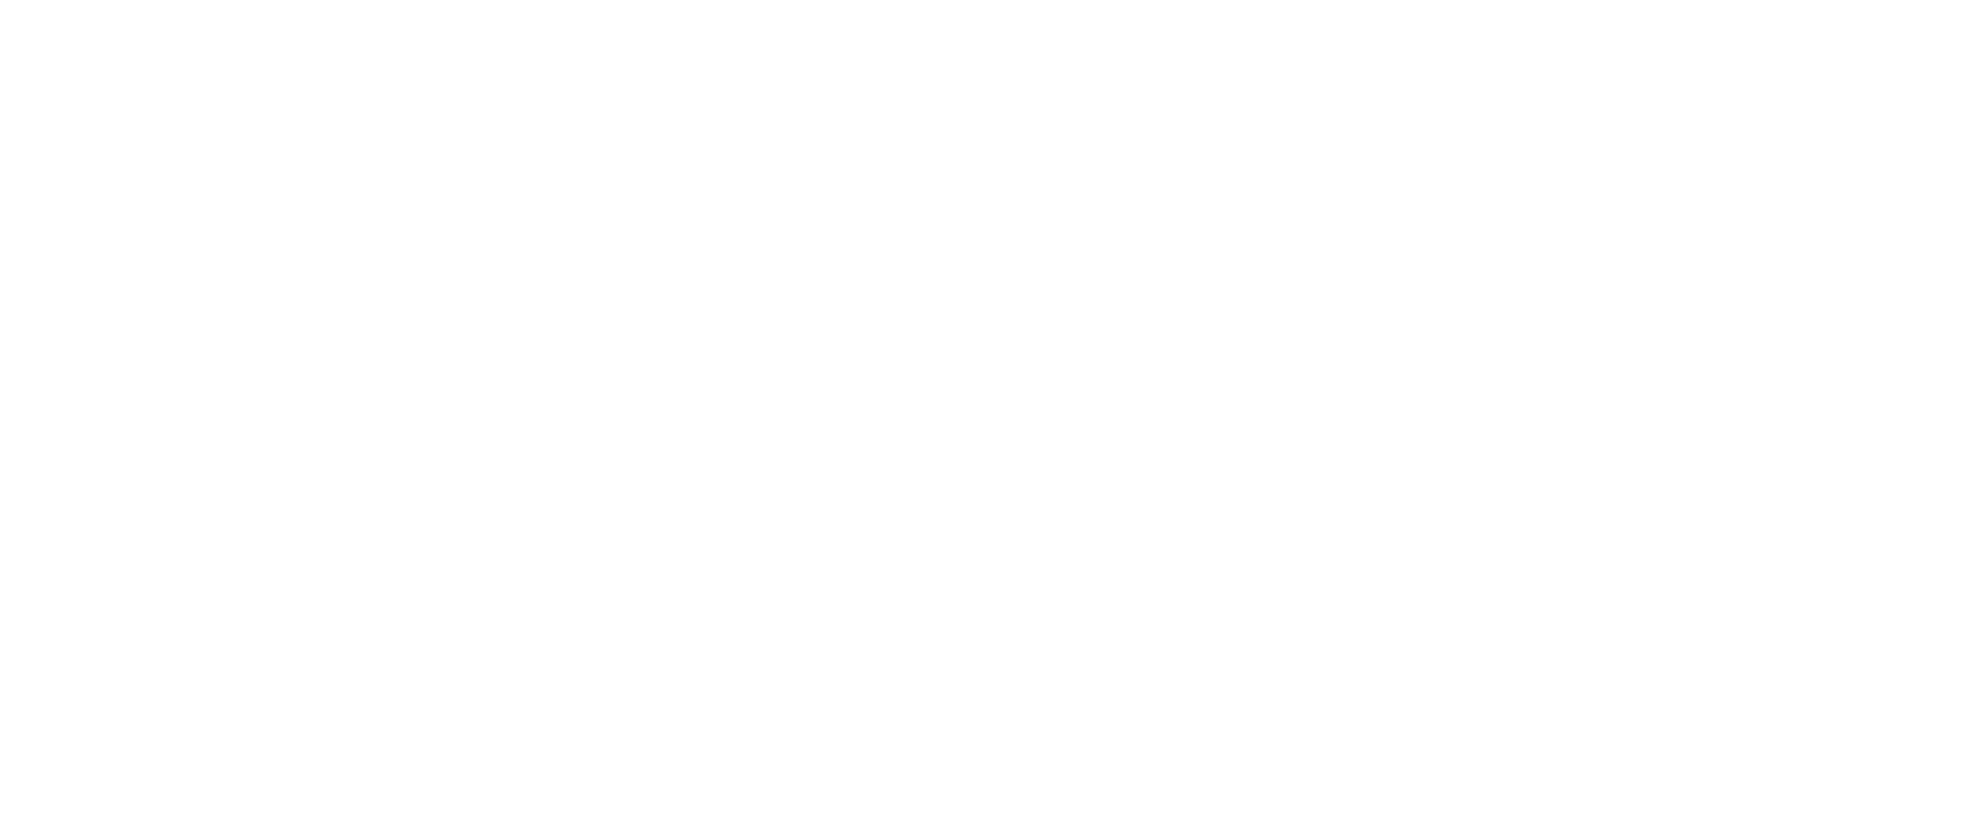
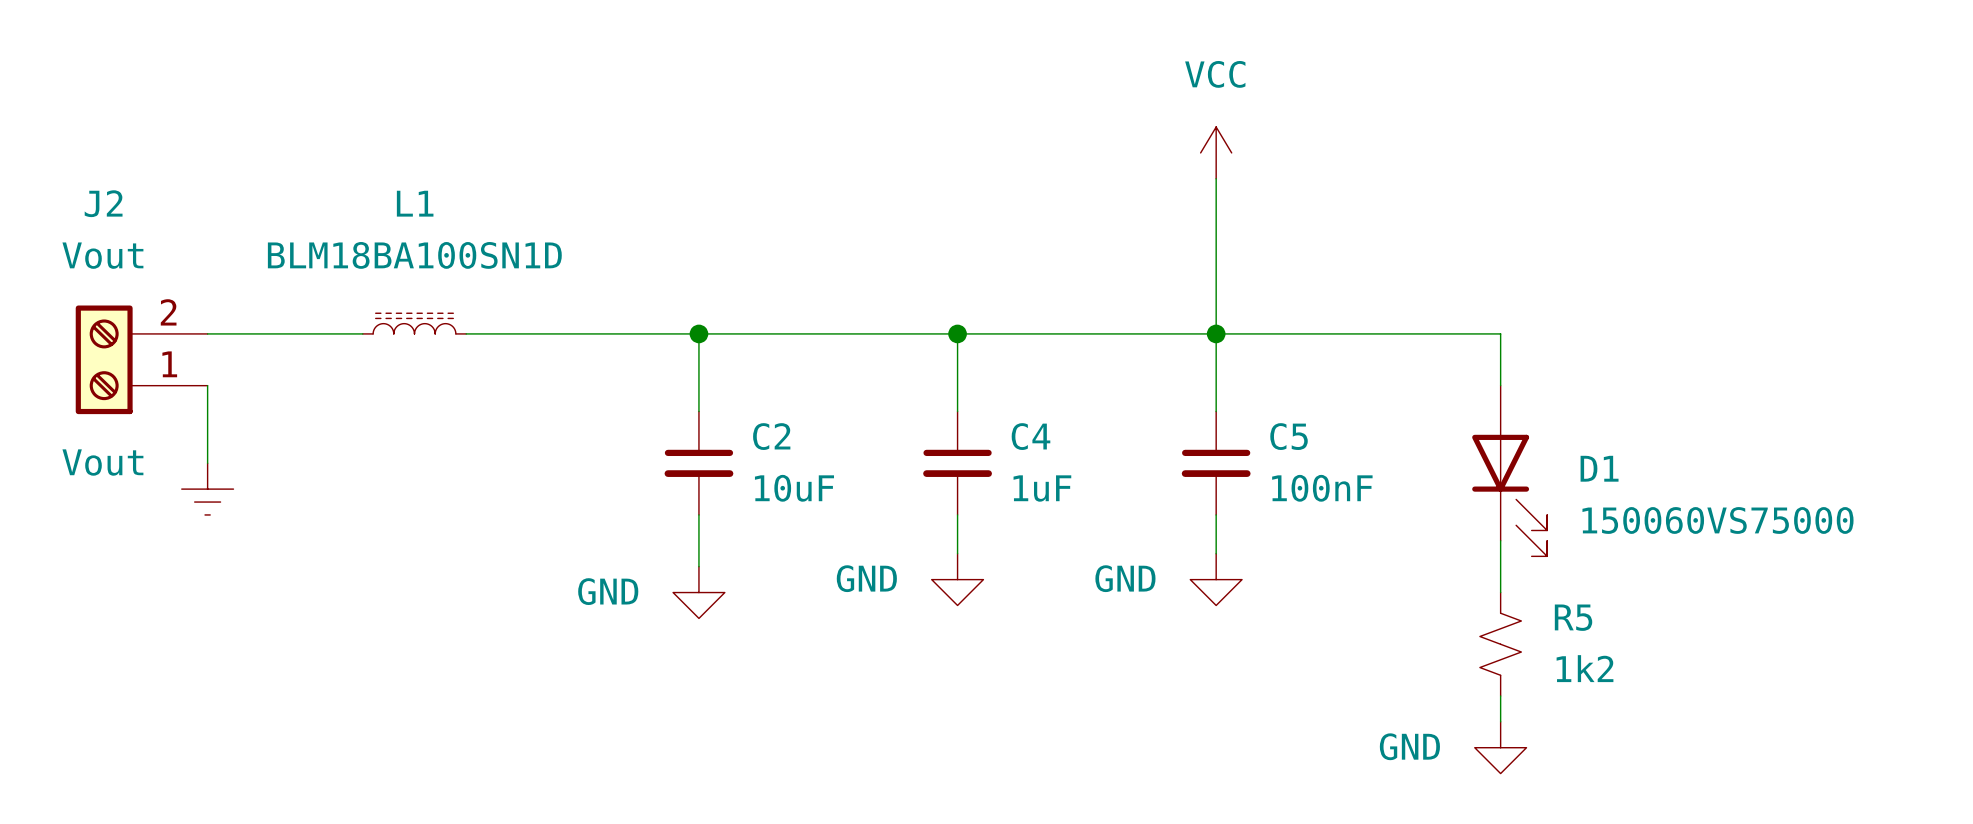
power symbol: none -> VCC (1216, 152)
wire: none -> (1216, 178) (1216, 411)
L1: none -> BLM18BA100SN1D (414, 323)
wire: none -> (207, 333) (362, 333)
wire: none -> (466, 333) (1500, 333) (1500, 385)
wire: none -> (698, 333) (698, 411)
junction: none -> (698, 333)
wire: none -> (957, 333) (957, 411)
junction: none -> (957, 333)
junction: none -> (1216, 333)
J2: none -> Vout (141, 359)
wire: none -> (207, 385) (207, 463)
C2: none -> 10uF (698, 463)
C4: none -> 1uF (957, 463)
C5: none -> 100nF (1216, 463)
D1: none -> 150060VS75000 (1509, 471)
power symbol: none -> (207, 489)
wire: none -> (698, 514) (698, 566)
wire: none -> (957, 514) (957, 553)
wire: none -> (1216, 514) (1216, 553)
wire: none -> (1500, 540) (1500, 592)
power symbol: none -> GND (957, 579)
power symbol: none -> GND (1216, 579)
power symbol: none -> GND (698, 592)
R5: none -> 1k2 (1500, 644)
wire: none -> (1500, 695) (1500, 721)
power symbol: none -> GND (1500, 747)

